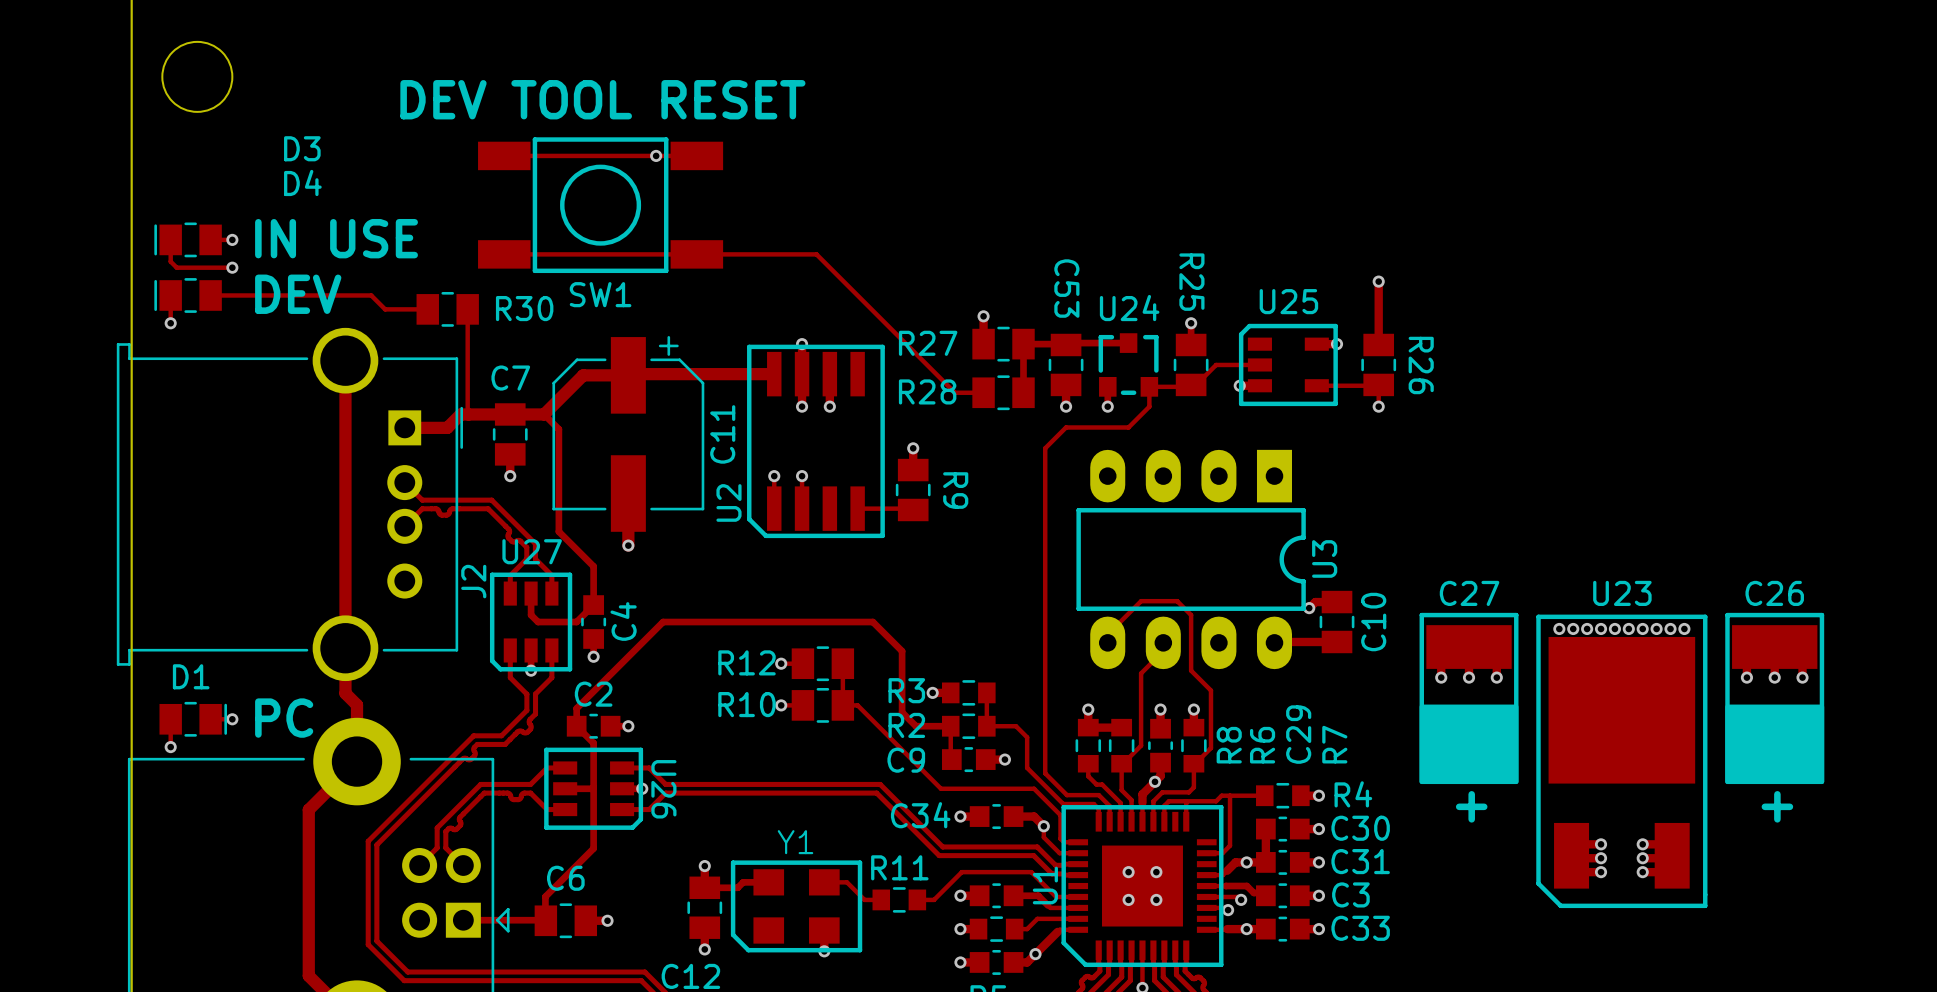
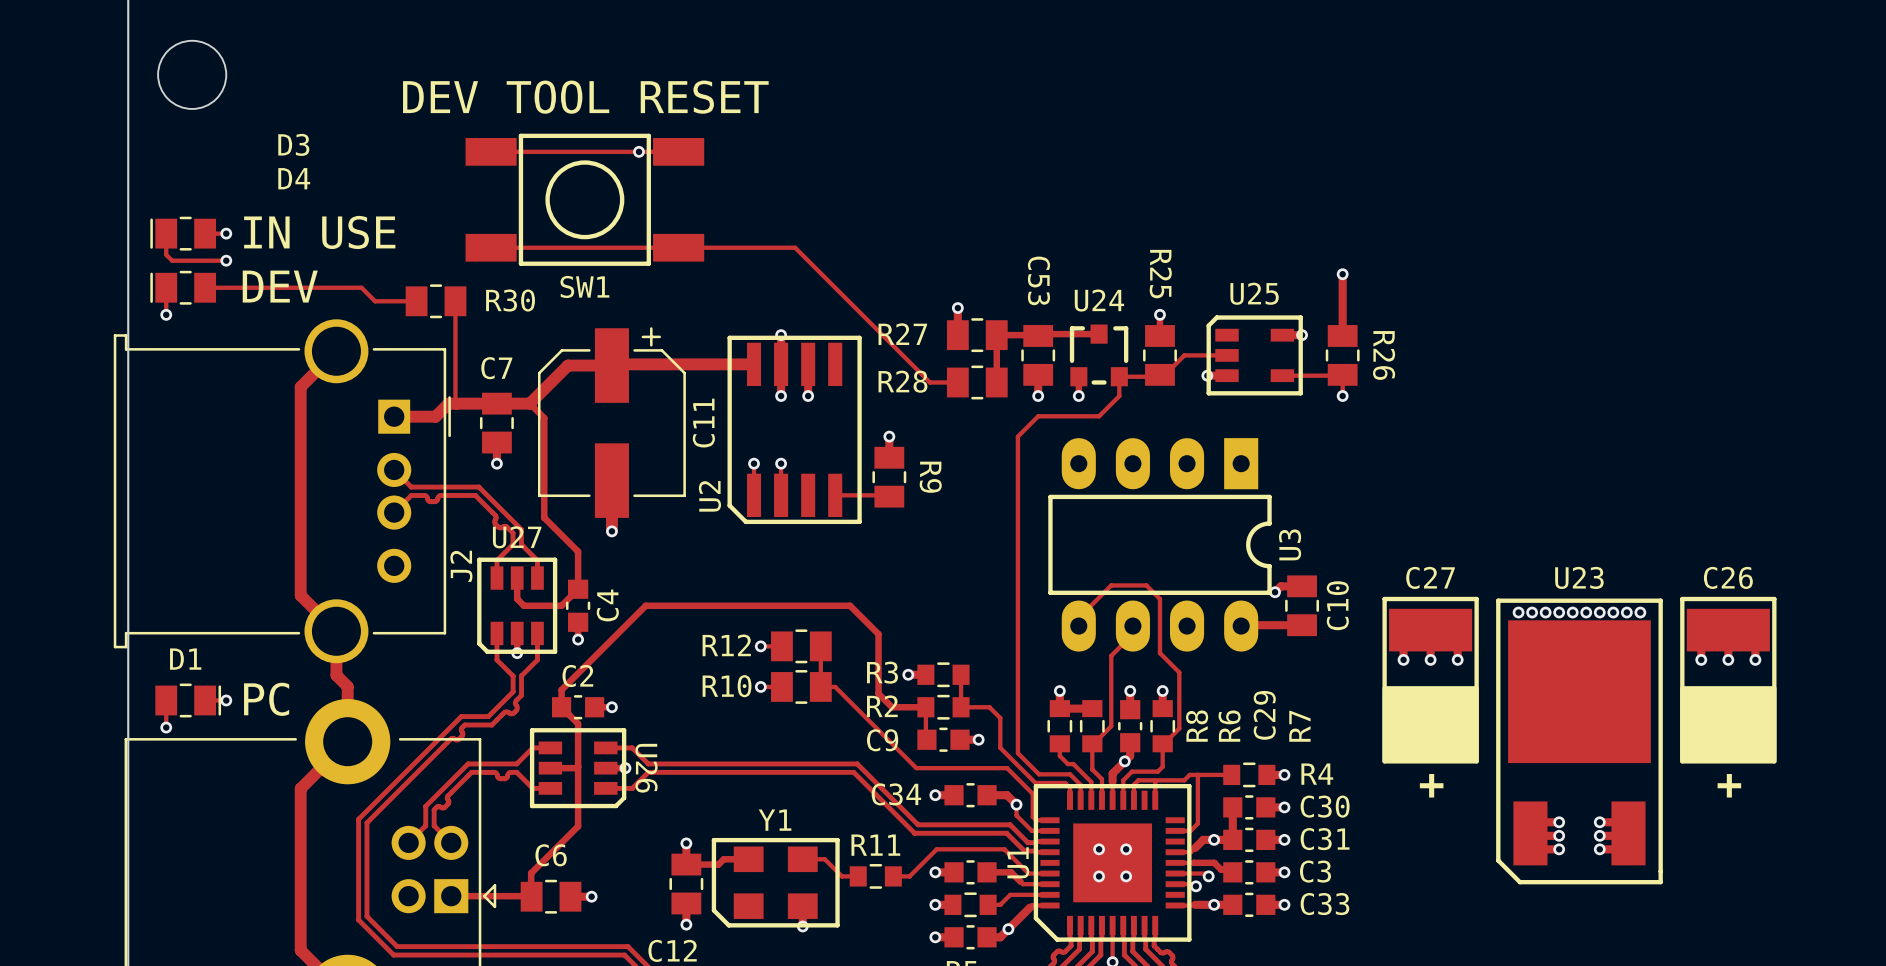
track: (345, 360) (345, 648) -> (336, 351) (300, 387) (300, 595) (336, 631)

